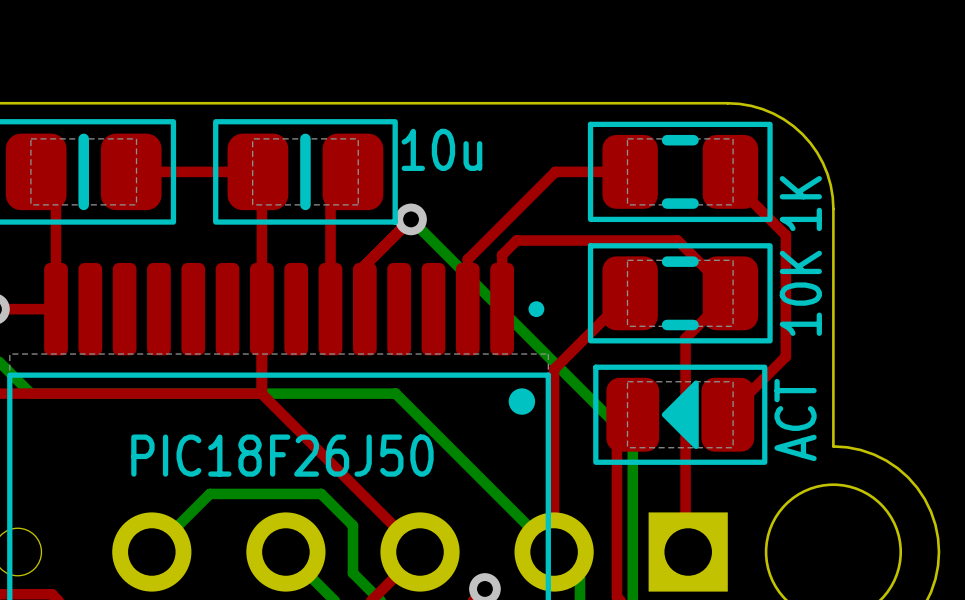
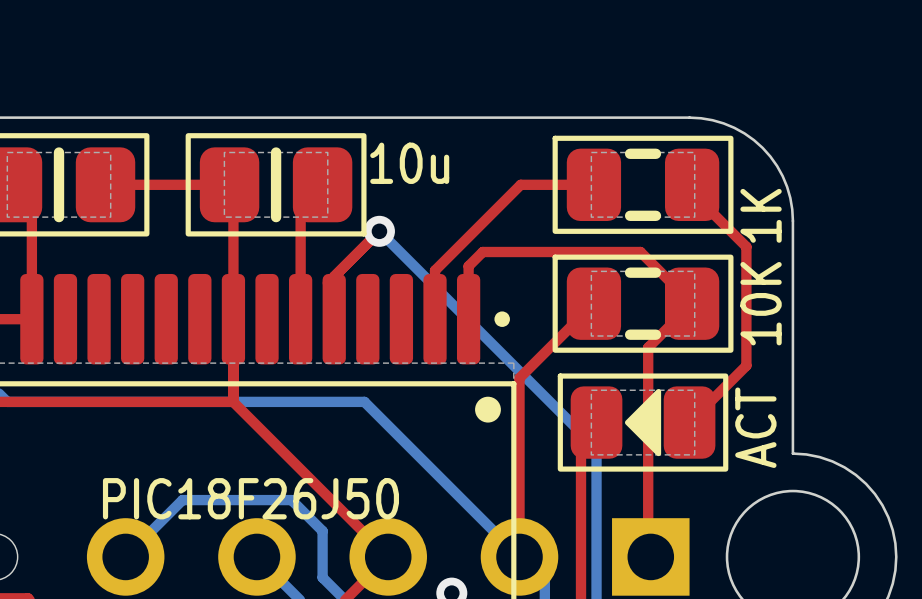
part value position: PIC18F26J50 (282, 455) -> PIC18F26J50 (250, 498)

